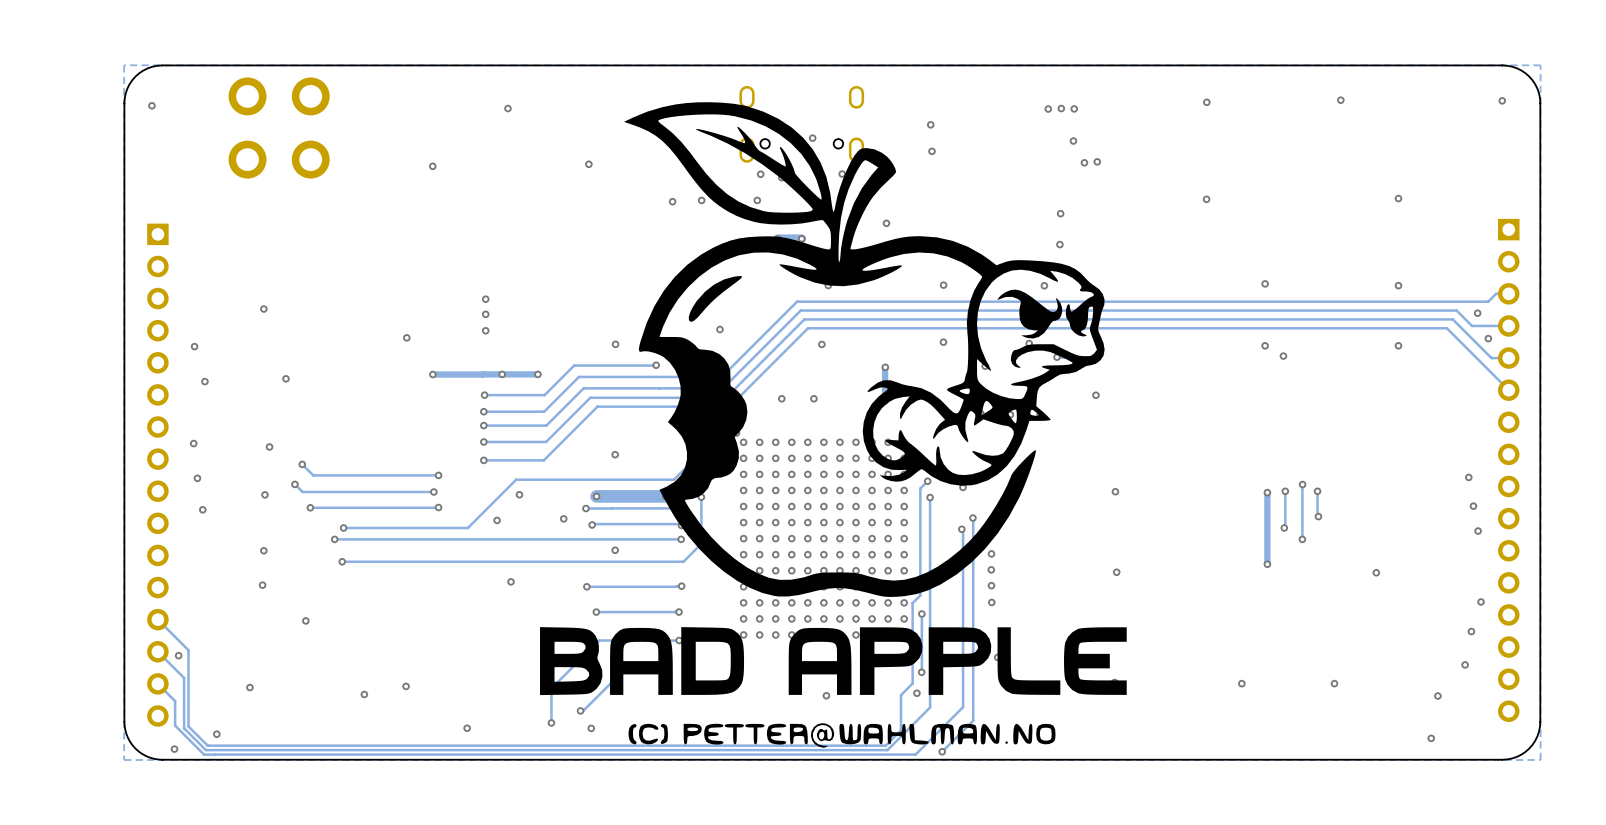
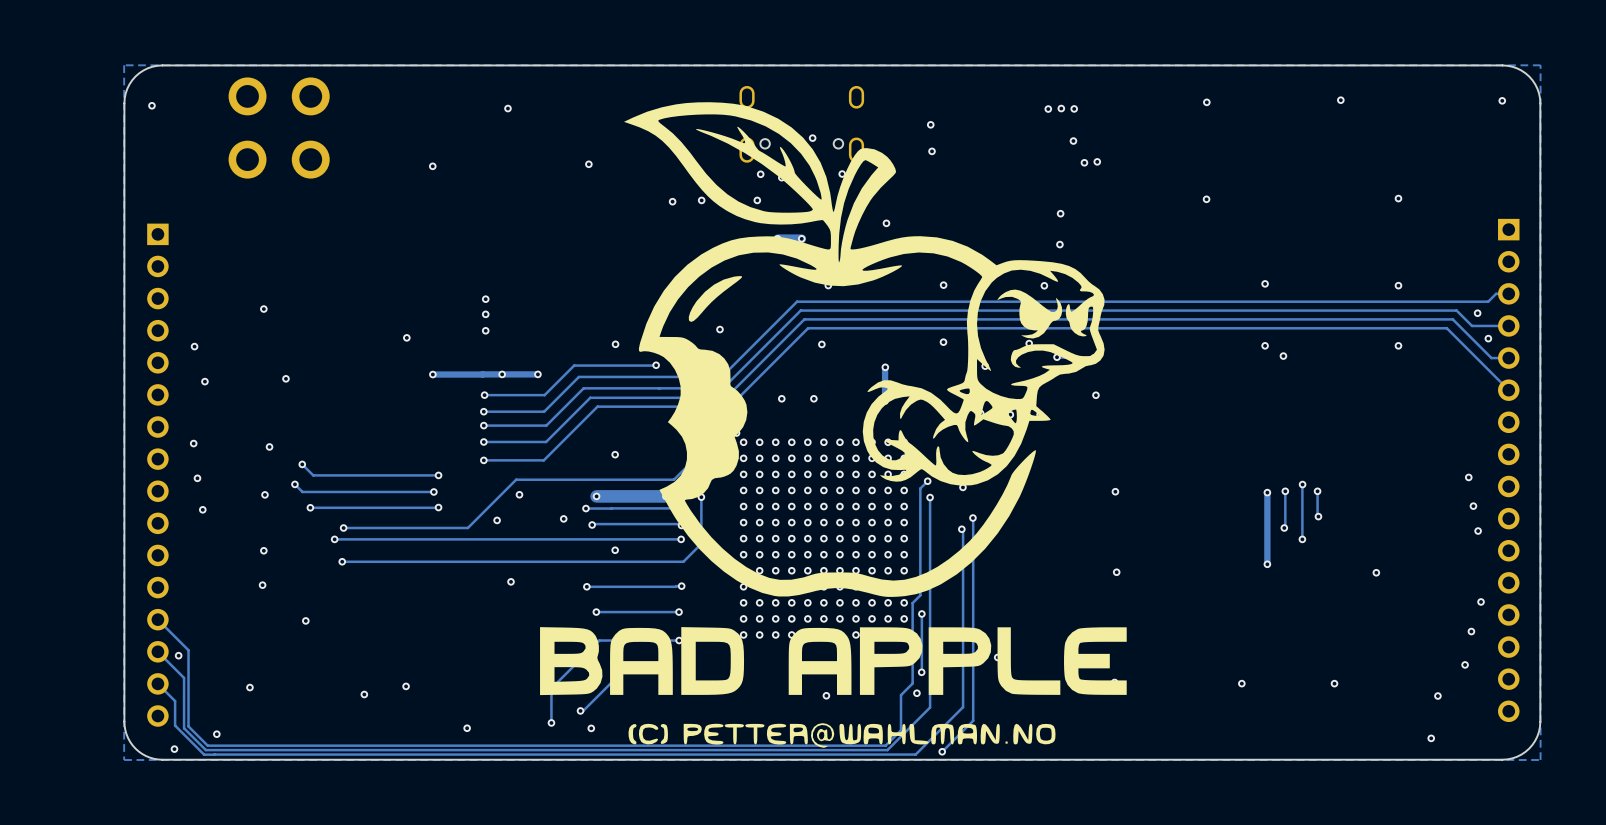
via: (991, 553) -> none
via: (991, 569) -> none
via: (991, 585) -> none
via: (991, 602) -> none

